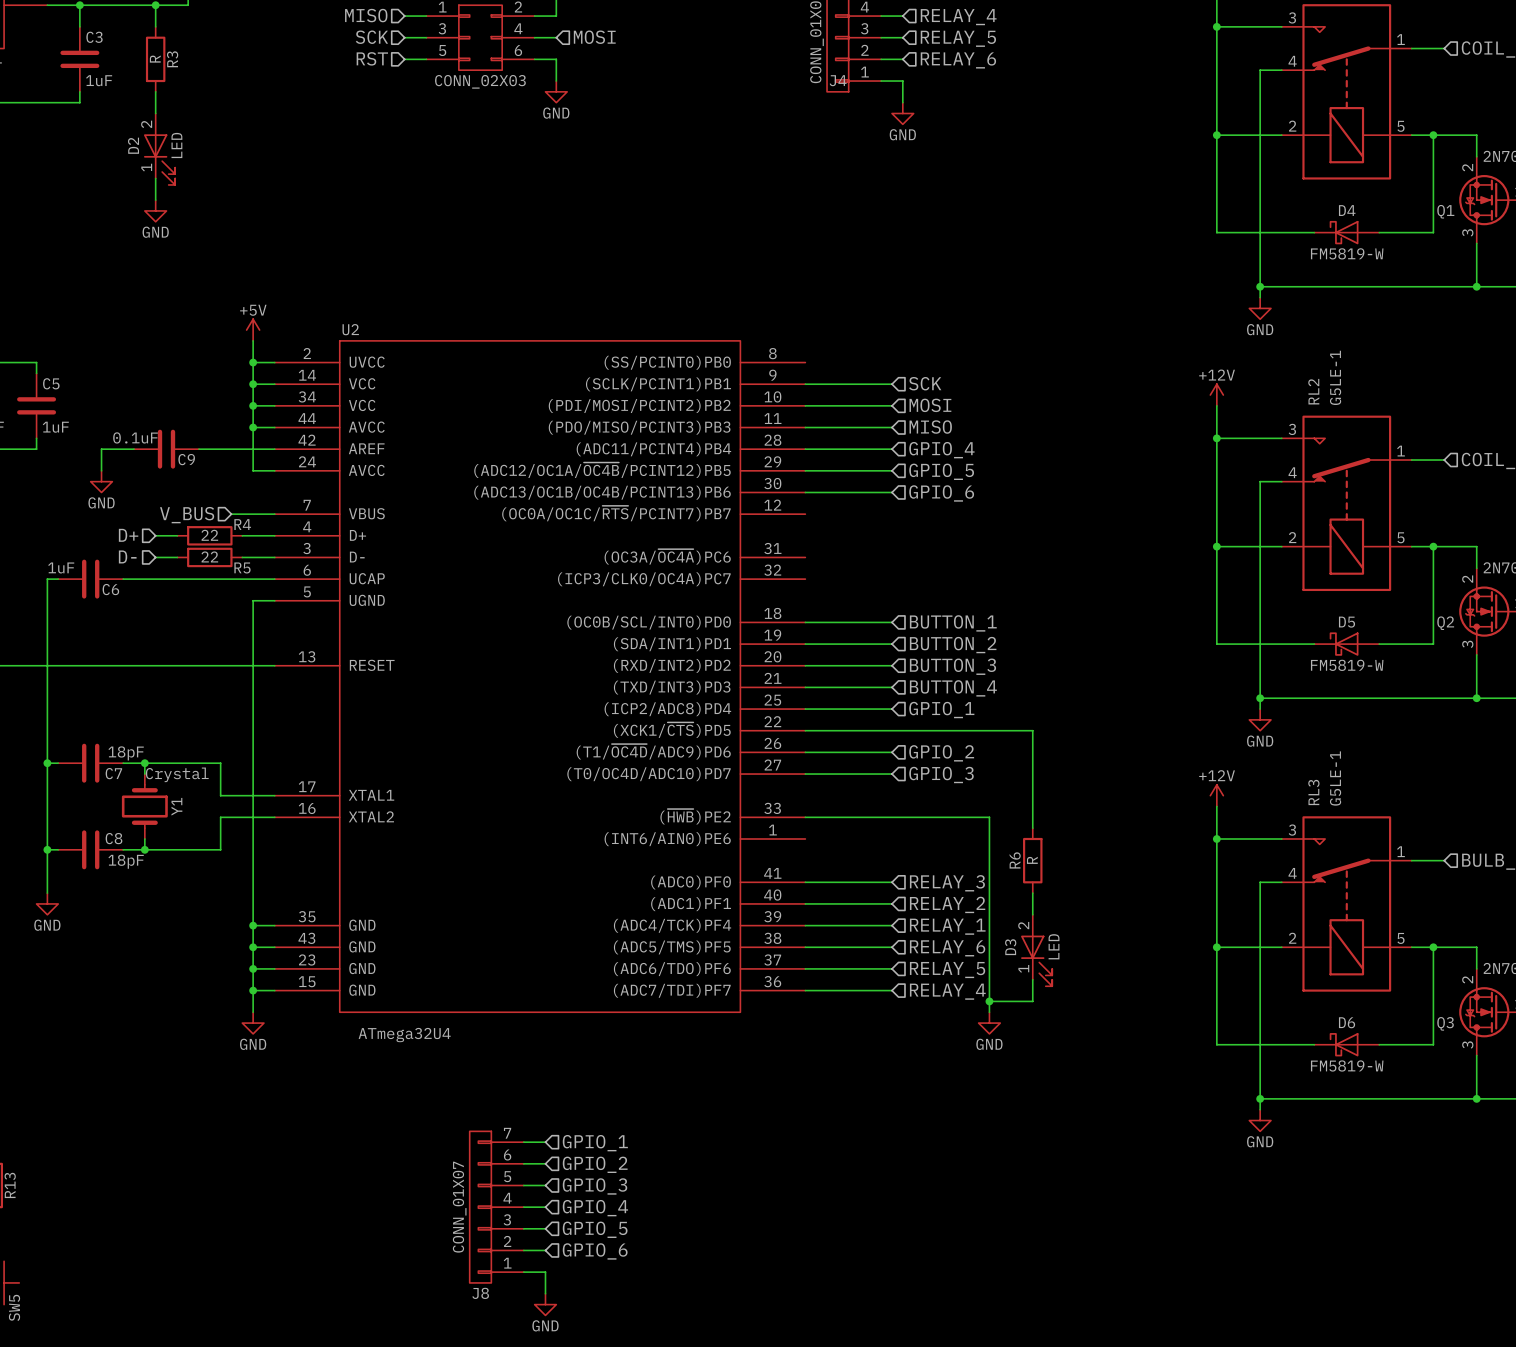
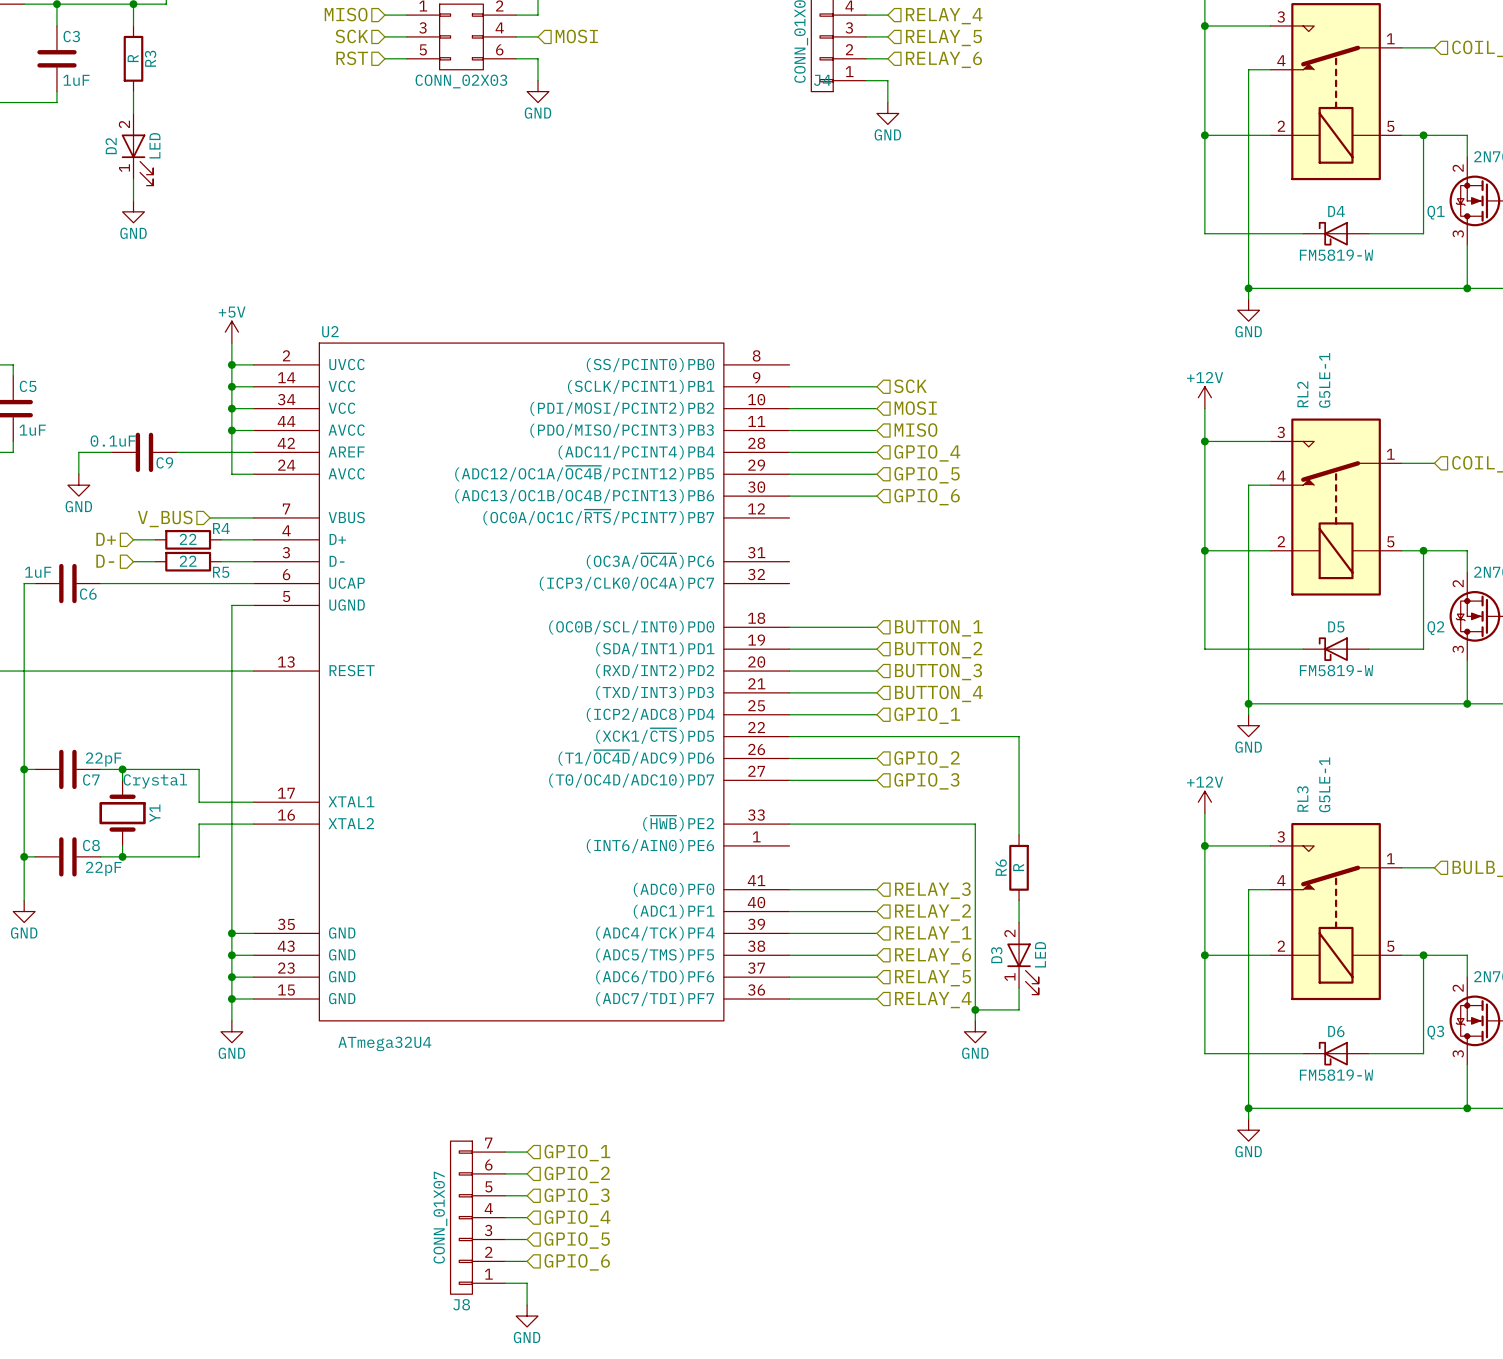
C7 value: 18pF (126, 753) -> 22pF (103, 759)
C8 value: 18pF (126, 861) -> 22pF (103, 868)

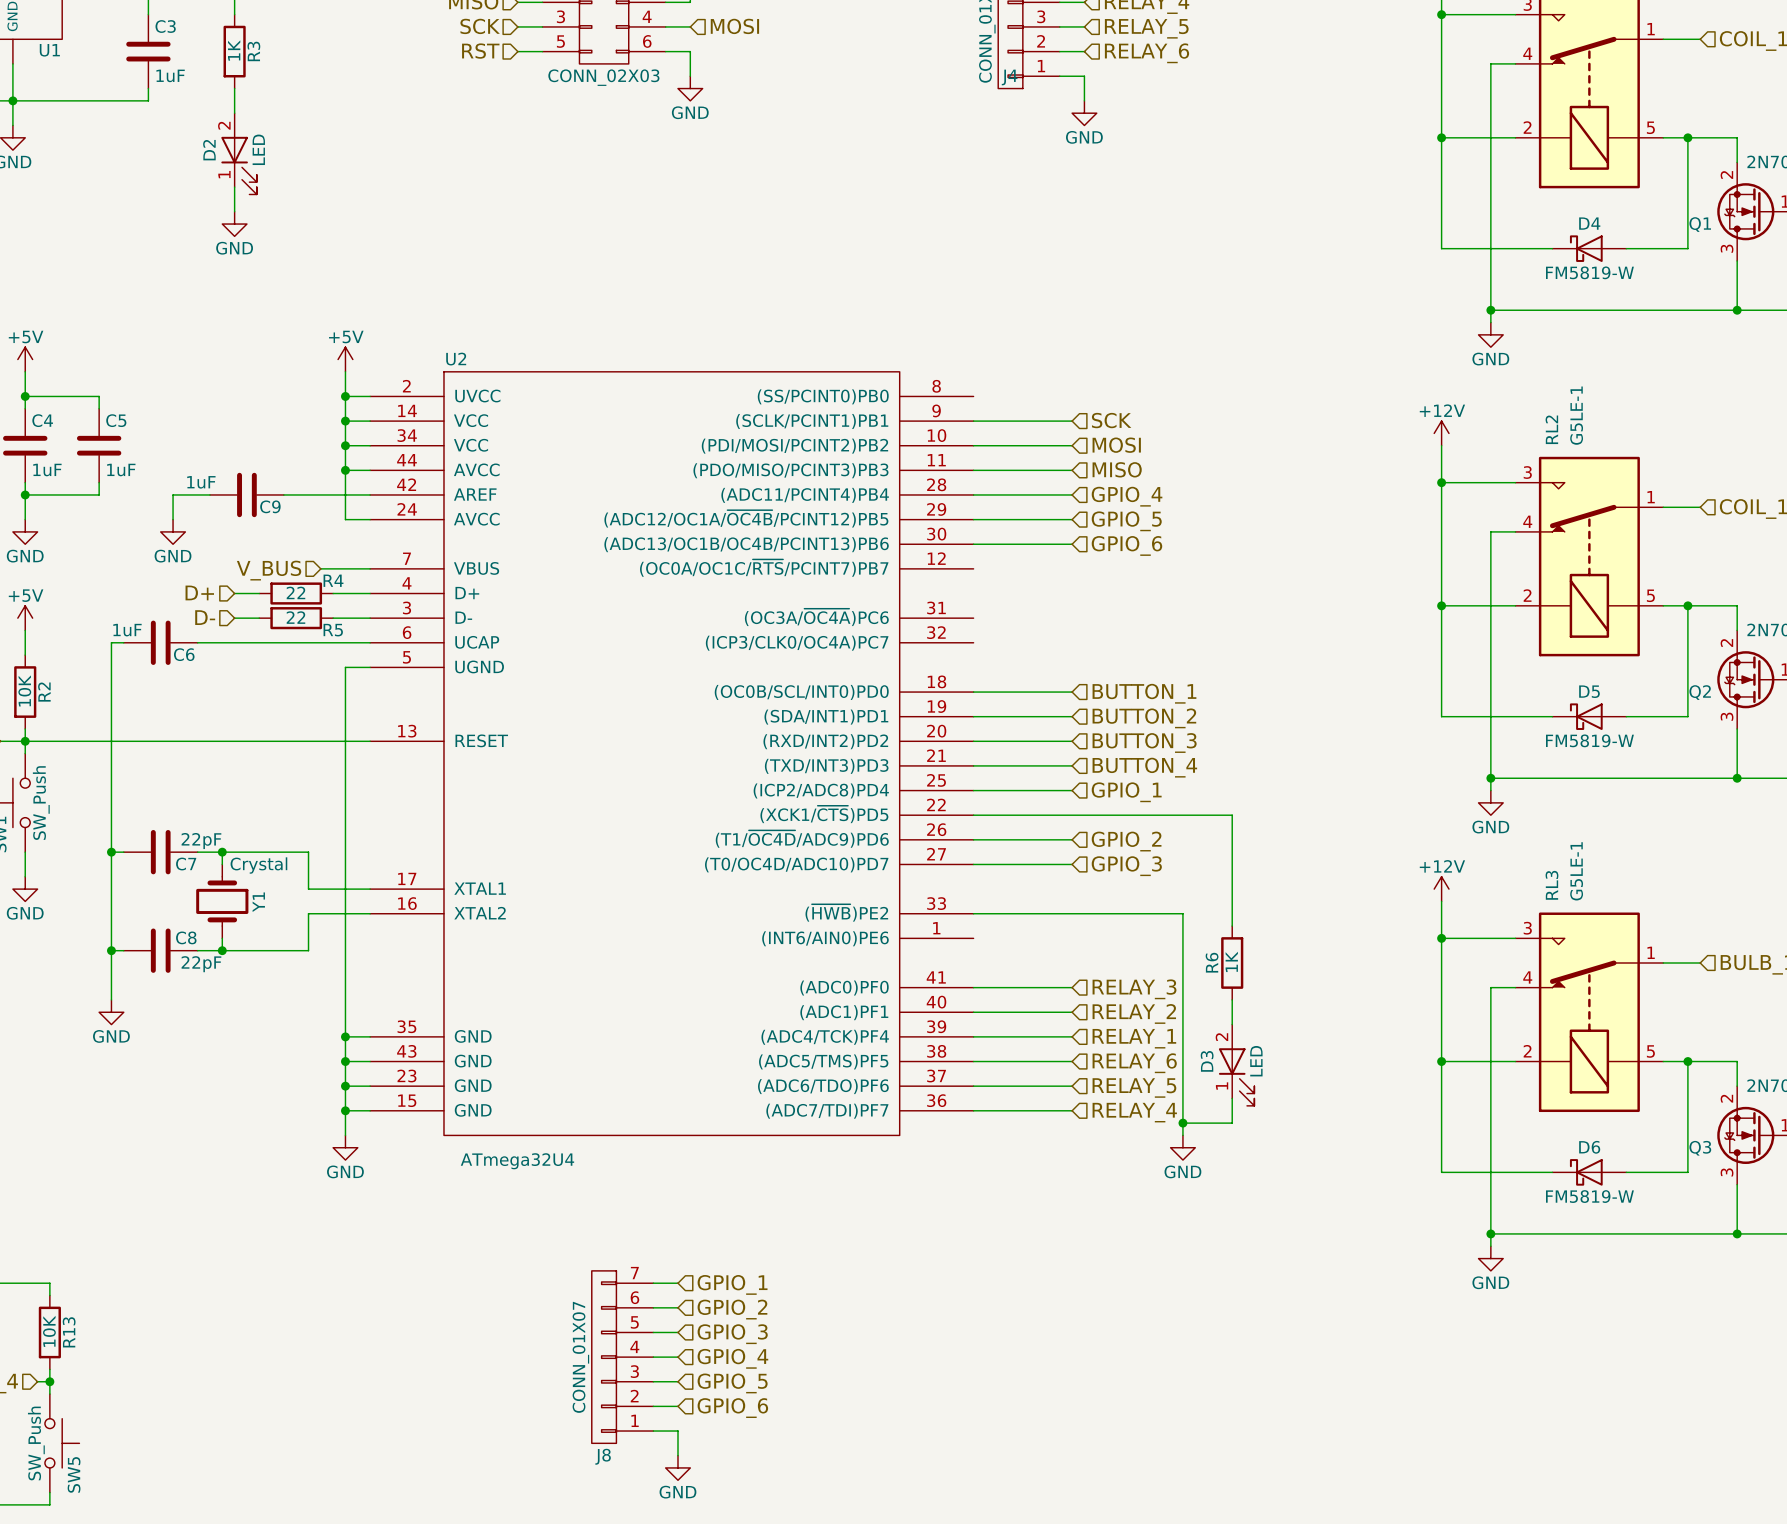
R3 value: R (133, 58) -> 1K (234, 50)
C9 value: 0.1uF (113, 441) -> 1uF (201, 482)
R6 value: R (1018, 867) -> 1K (1231, 961)

